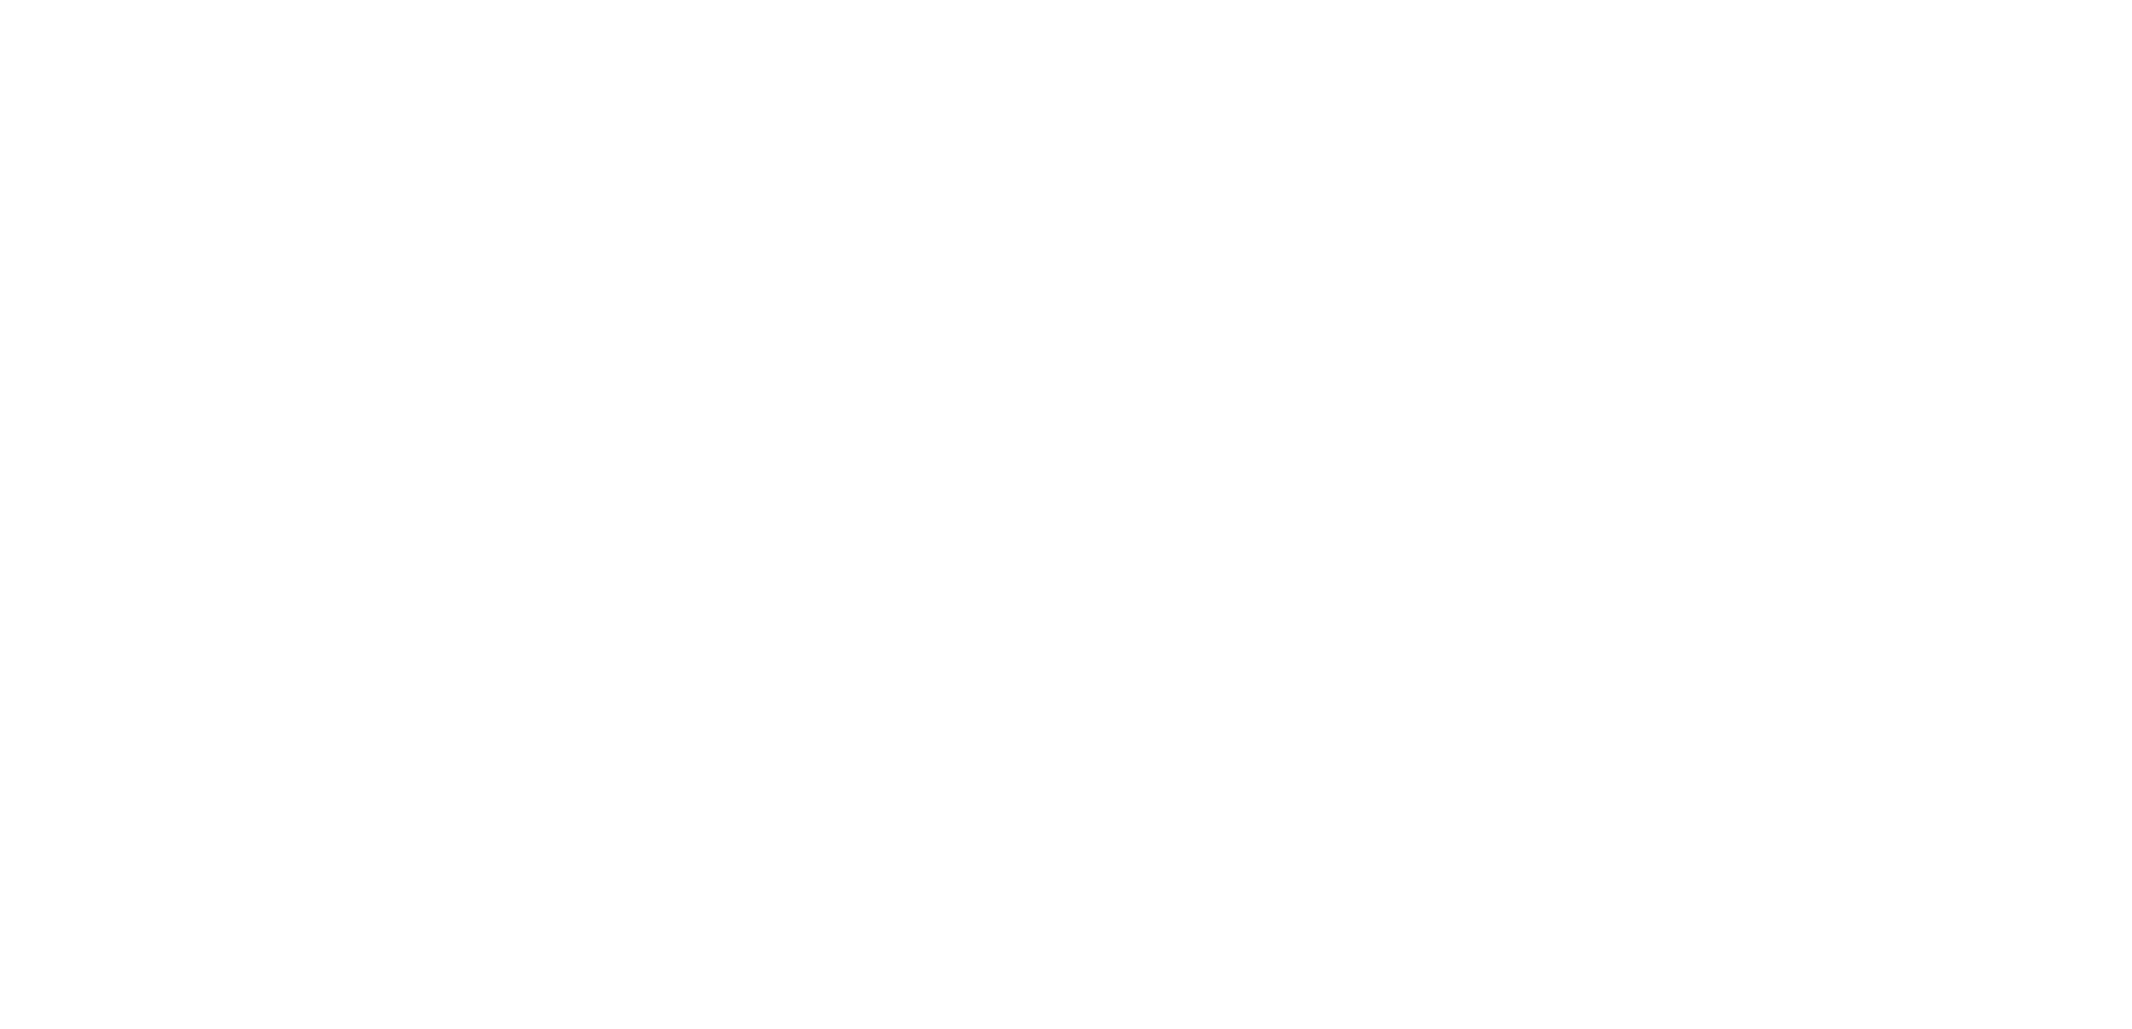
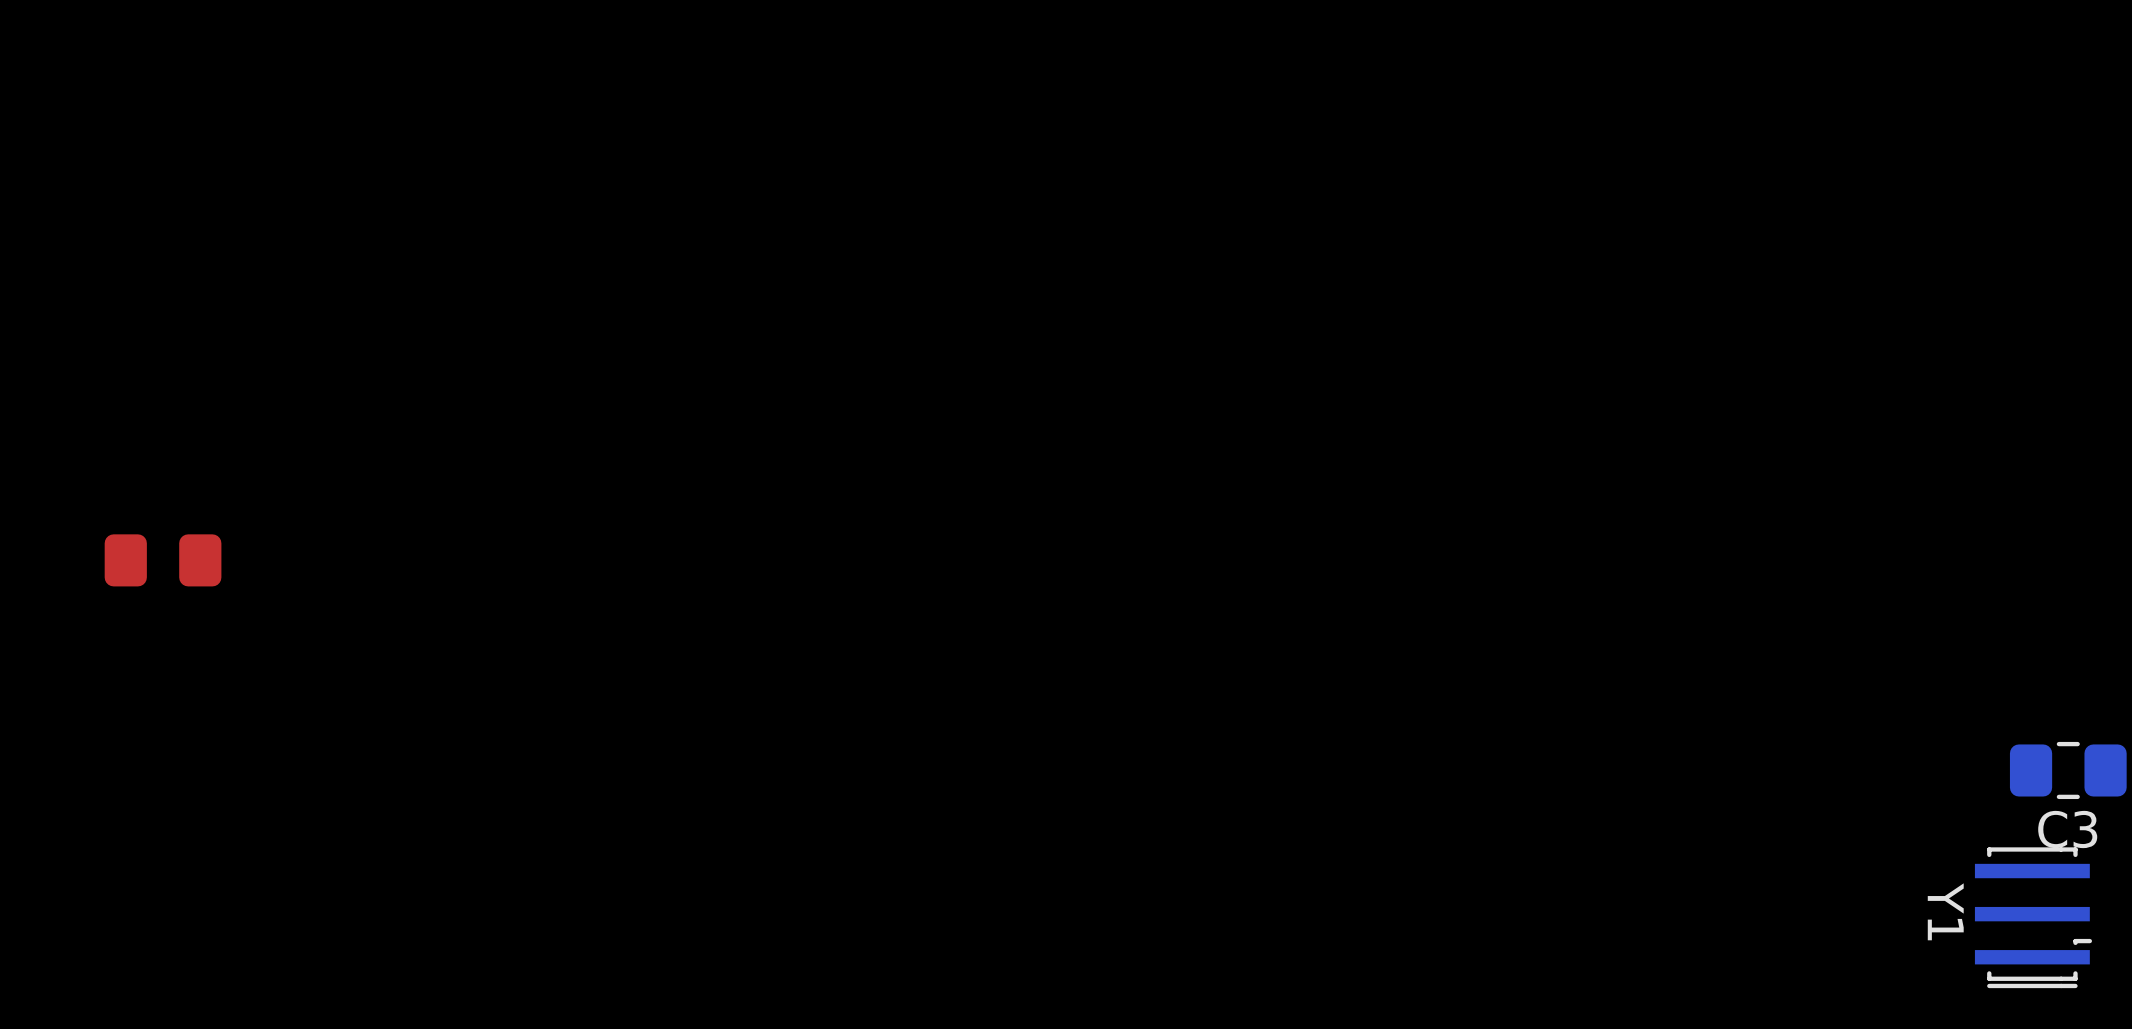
part: none -> (163, 560)
C3: none -> (2068, 770)
Y1: none -> (2033, 917)

